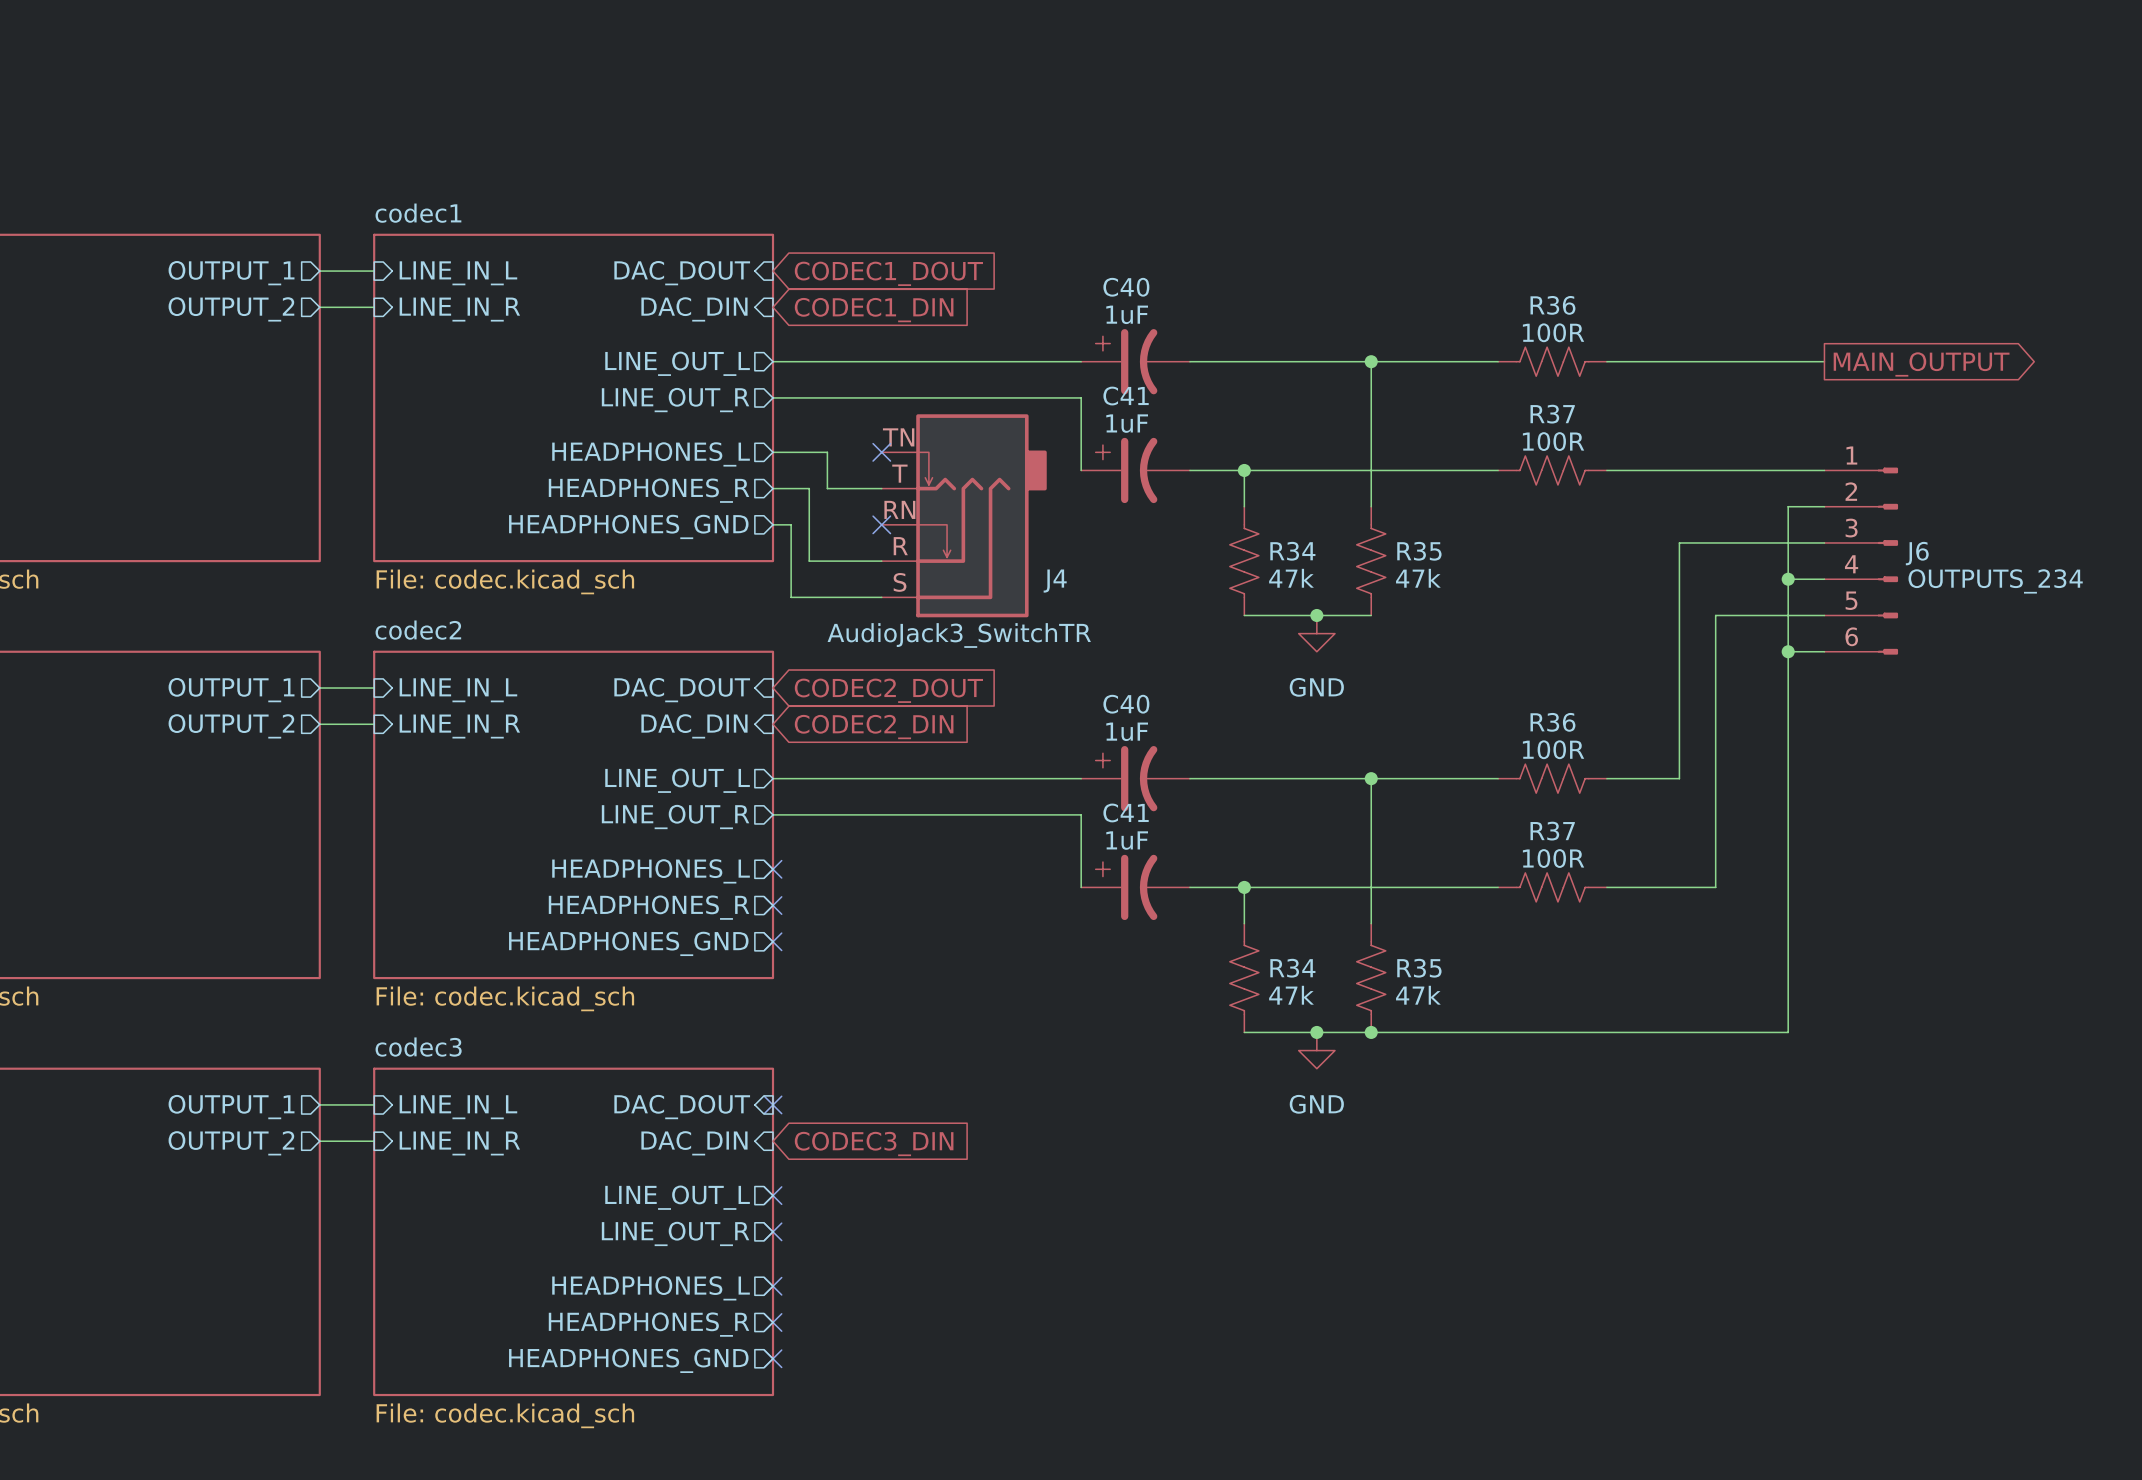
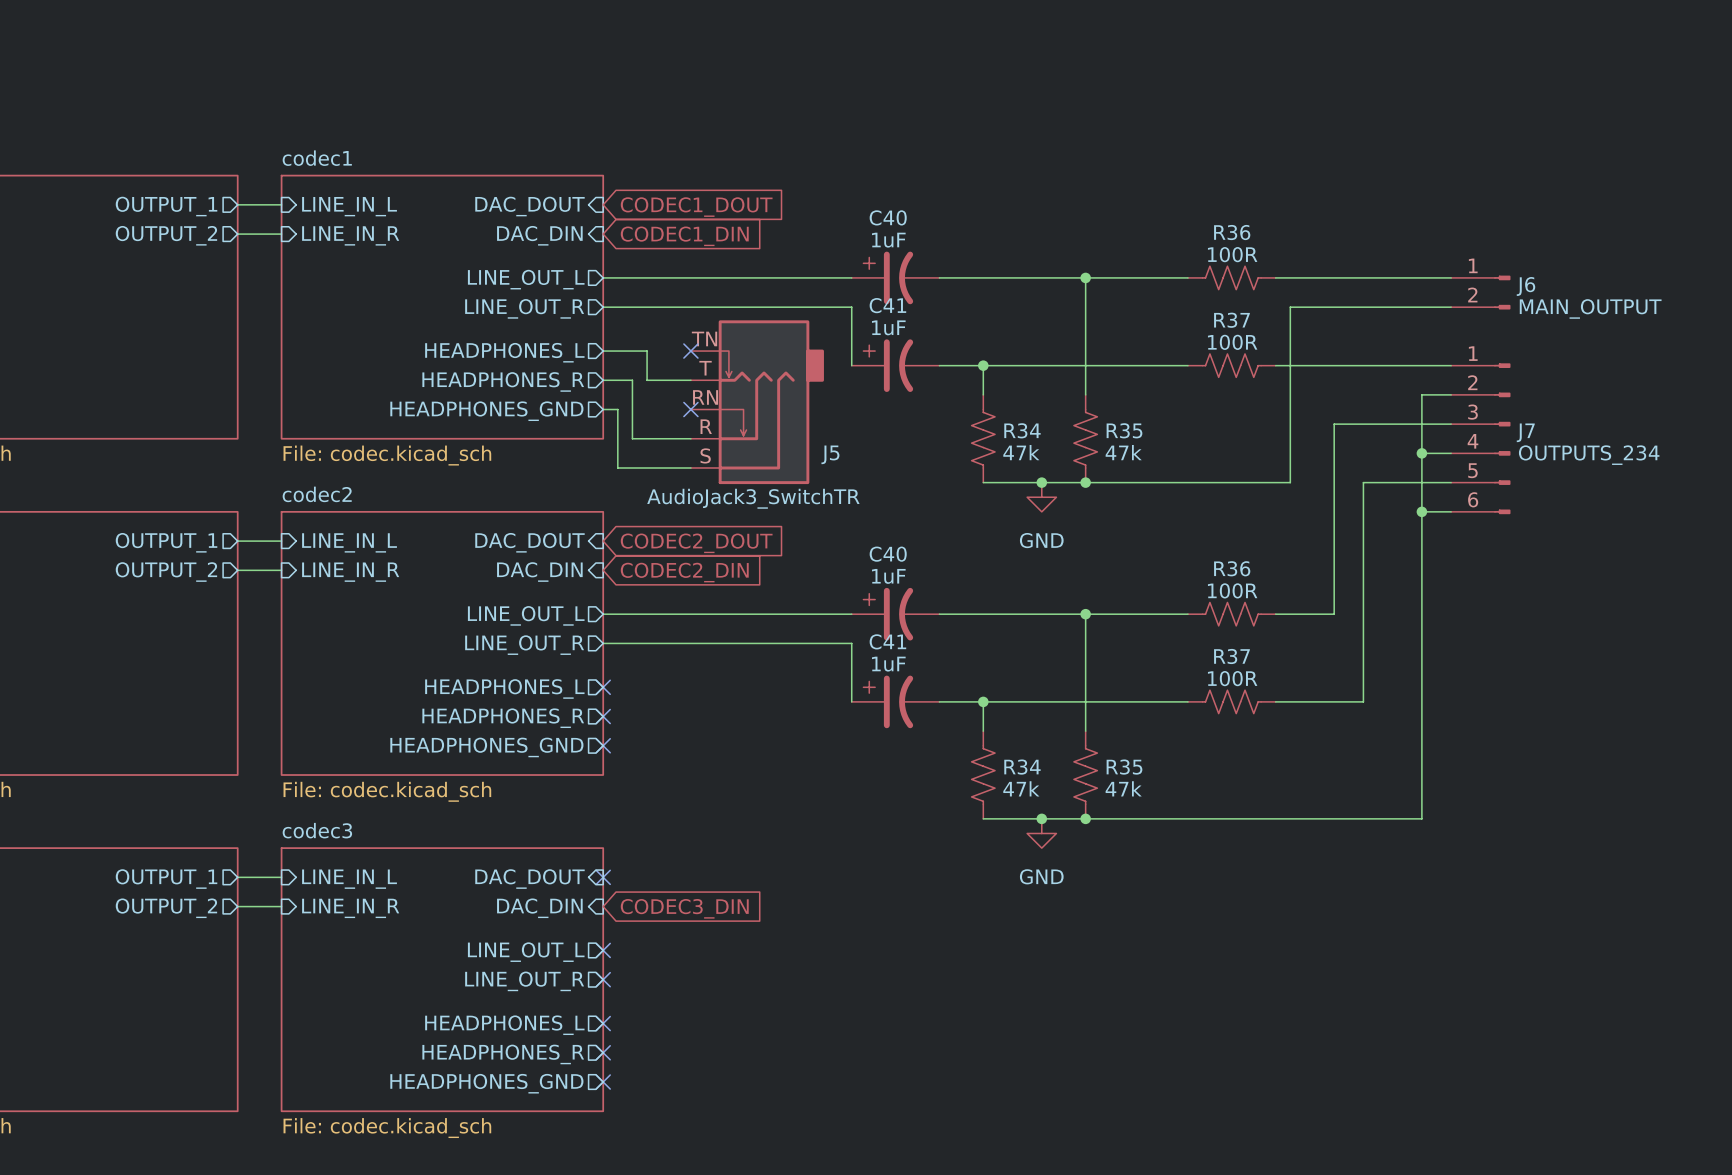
global label: MAIN_OUTPUT (1921, 364) -> none
J6: none -> MAIN_OUTPUT (1480, 292)
wire: none -> (1451, 307) (1290, 307) (1290, 482) (1085, 482)
J6 name: J6 (1917, 553) -> J7 (1525, 432)
J4 name: J4 (1055, 581) -> J5 (830, 454)
junction: none -> (1085, 482)

